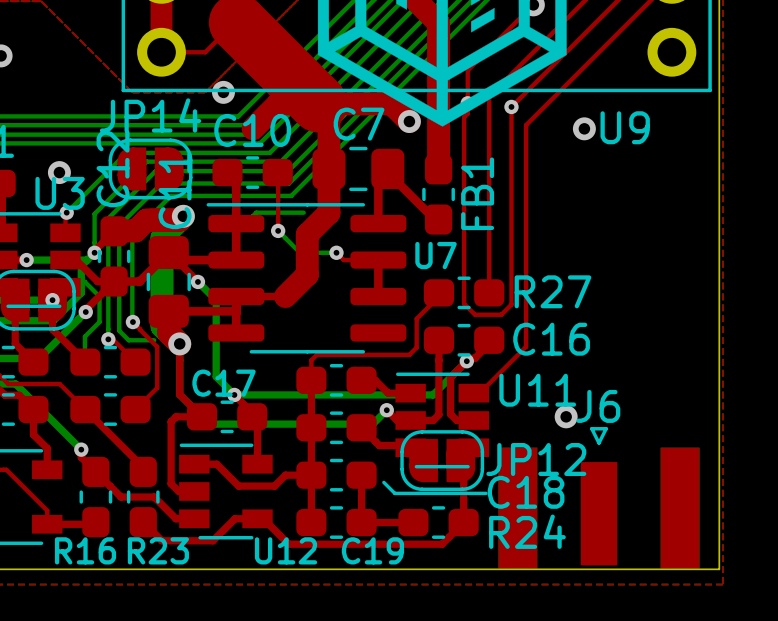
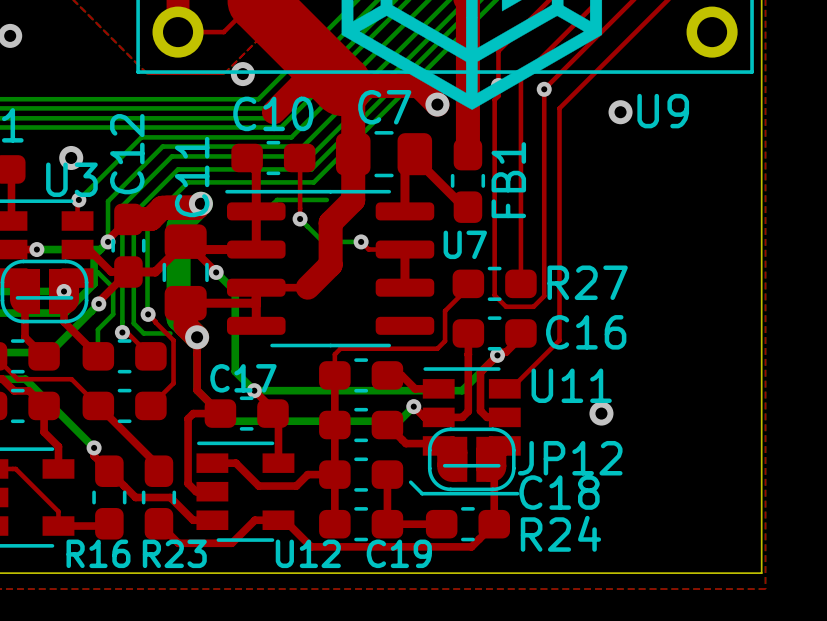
JP14: (150, 168) -> none
J6: (598, 497) -> none

